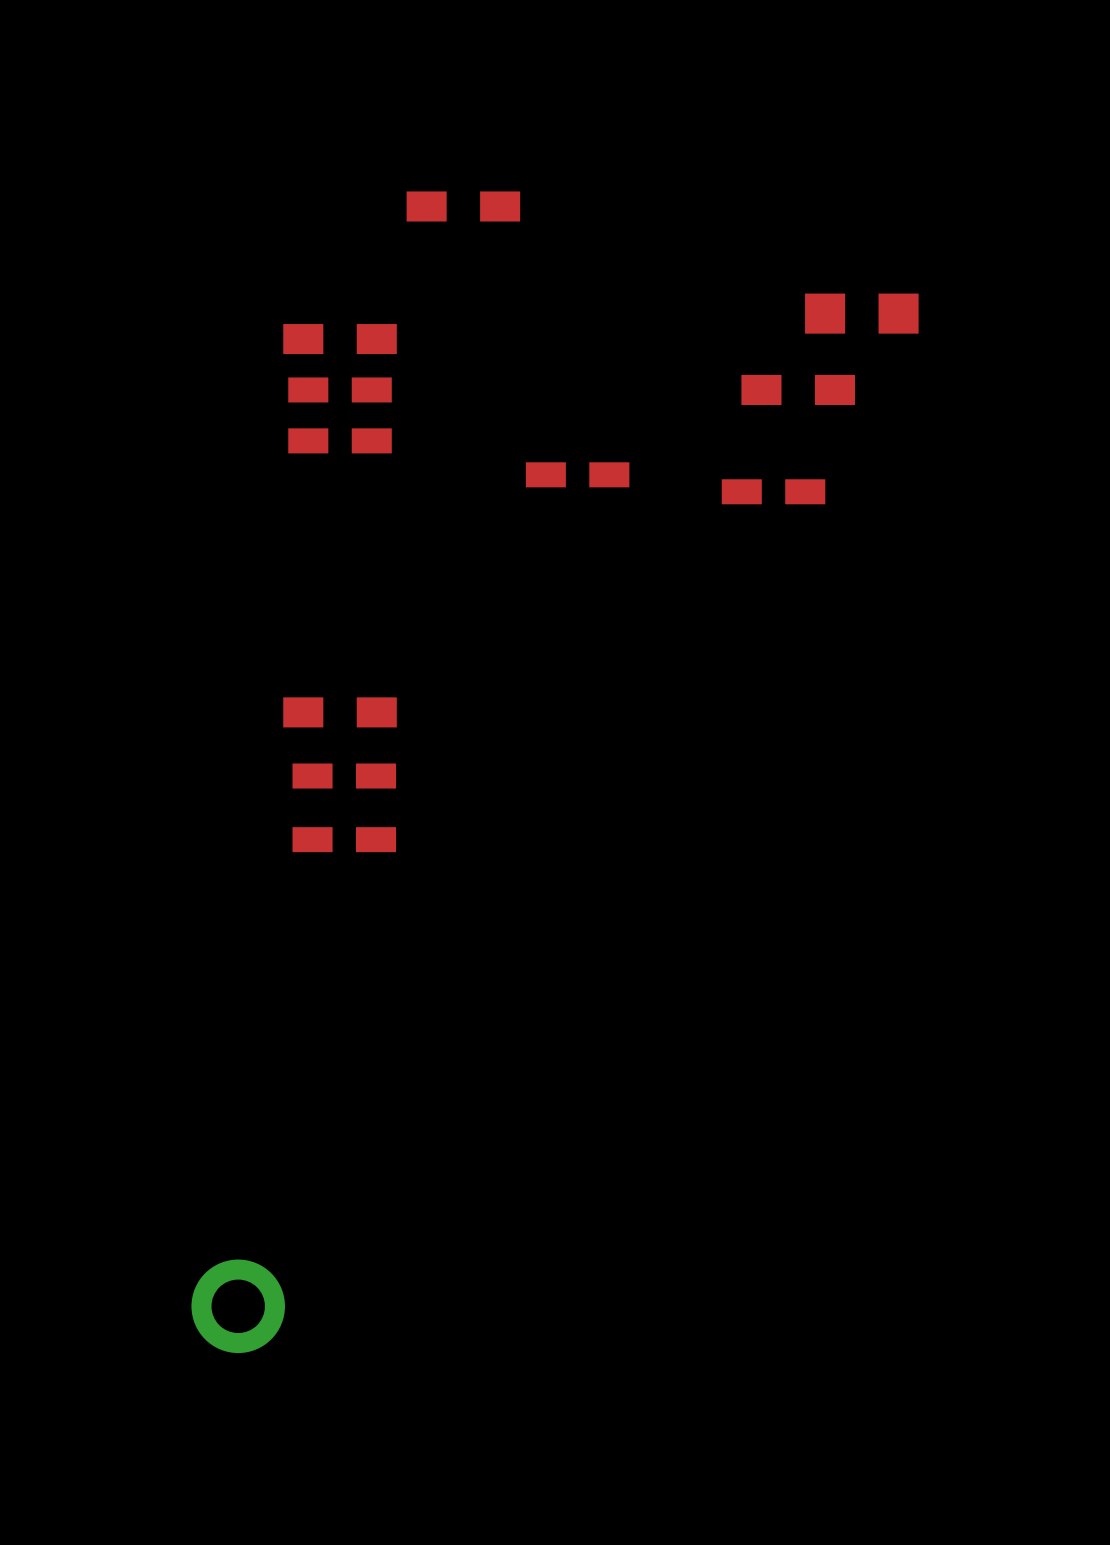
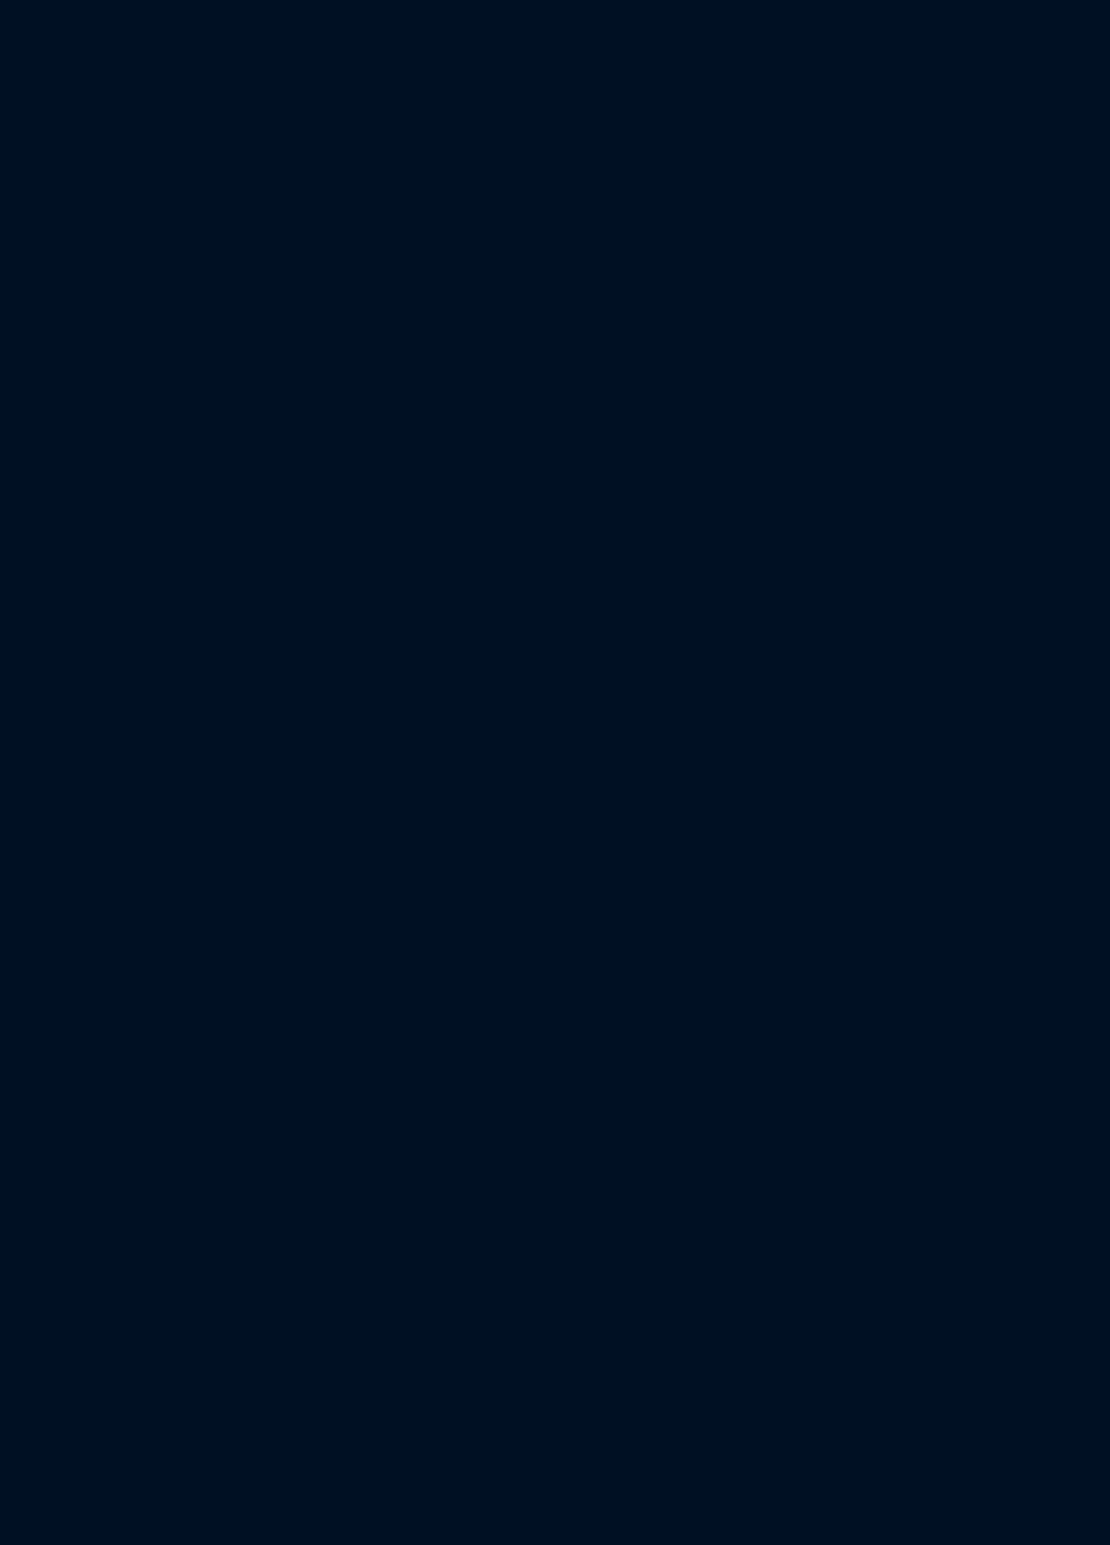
part: (463, 206) -> none
part: (861, 313) -> none
part: (340, 339) -> none
part: (340, 389) -> none
part: (798, 389) -> none
part: (340, 440) -> none
part: (577, 474) -> none
part: (773, 491) -> none
part: (340, 712) -> none
part: (344, 776) -> none
part: (344, 839) -> none
part: (238, 1306) -> none

